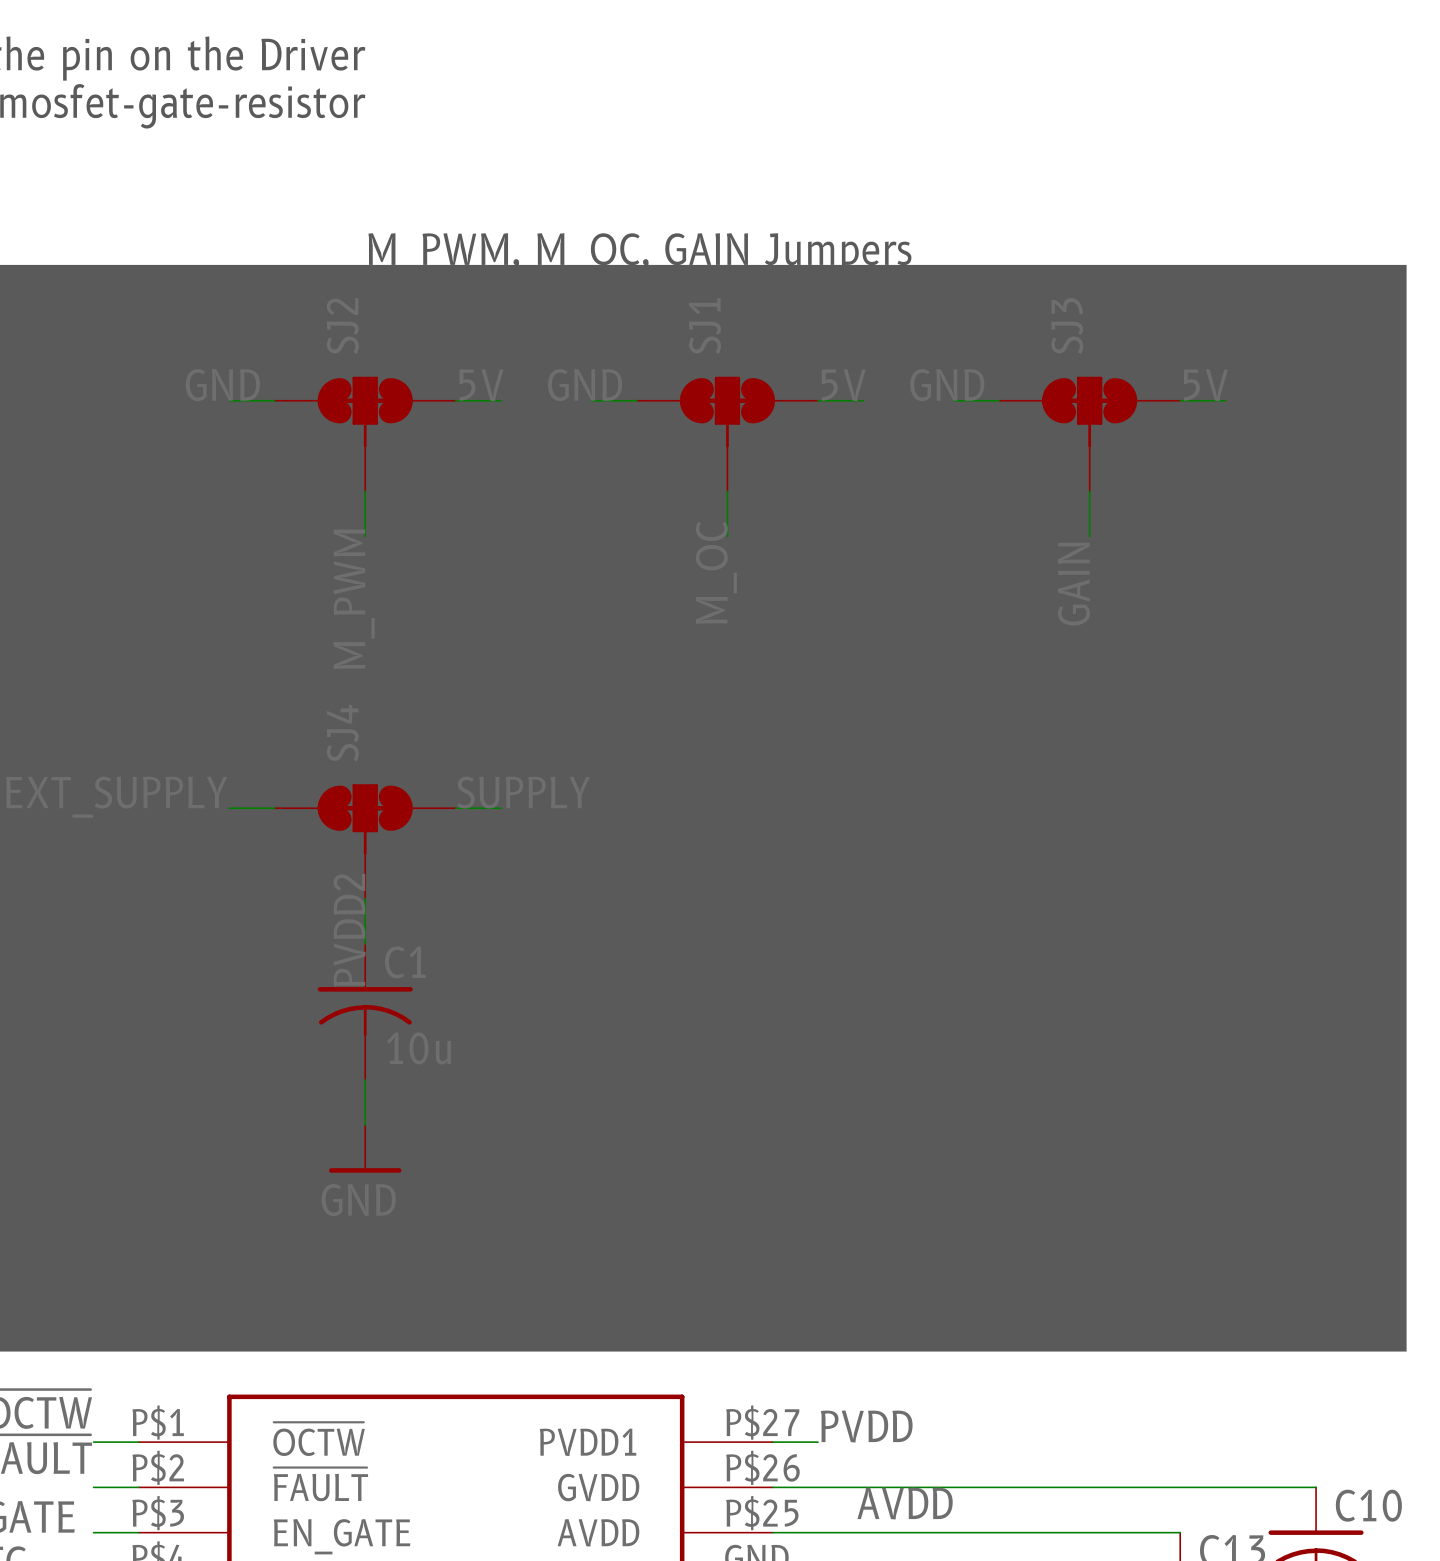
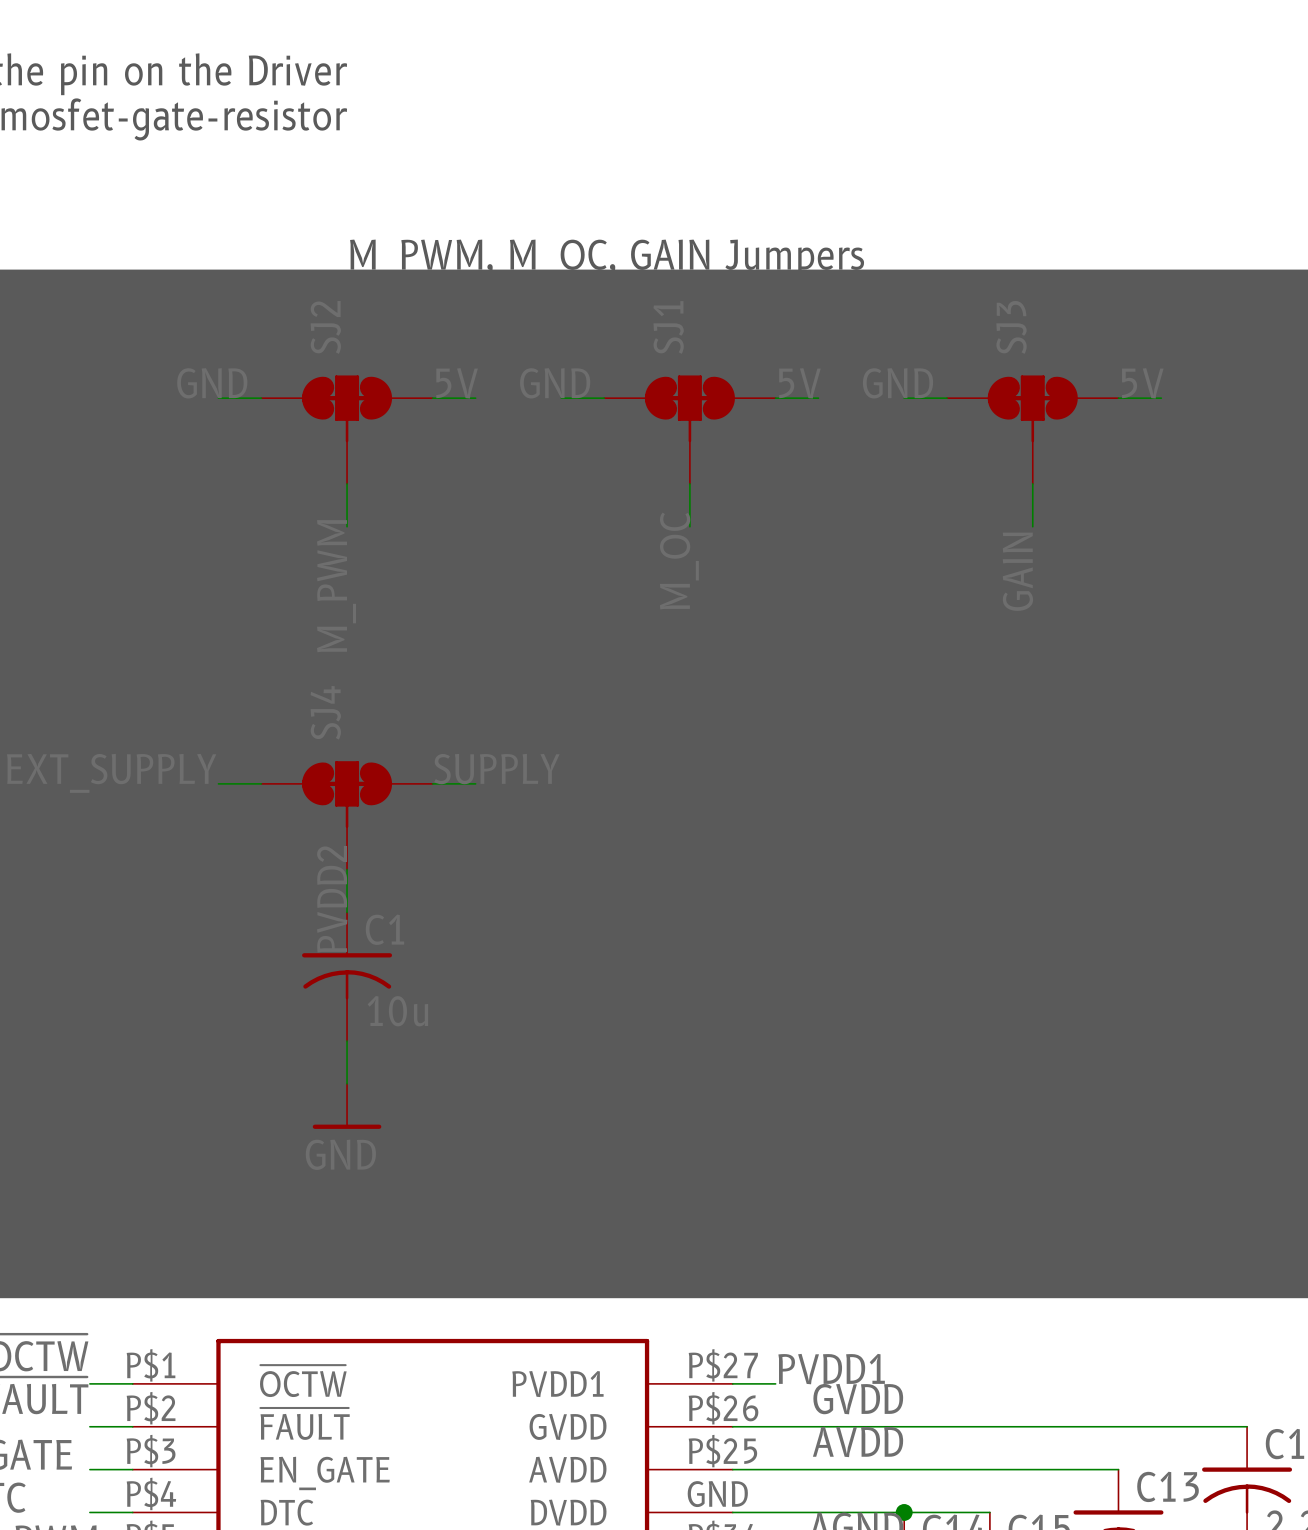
label: PVDD (866, 1426) -> PVDD1 (831, 1369)
label: none -> GVDD (858, 1399)

